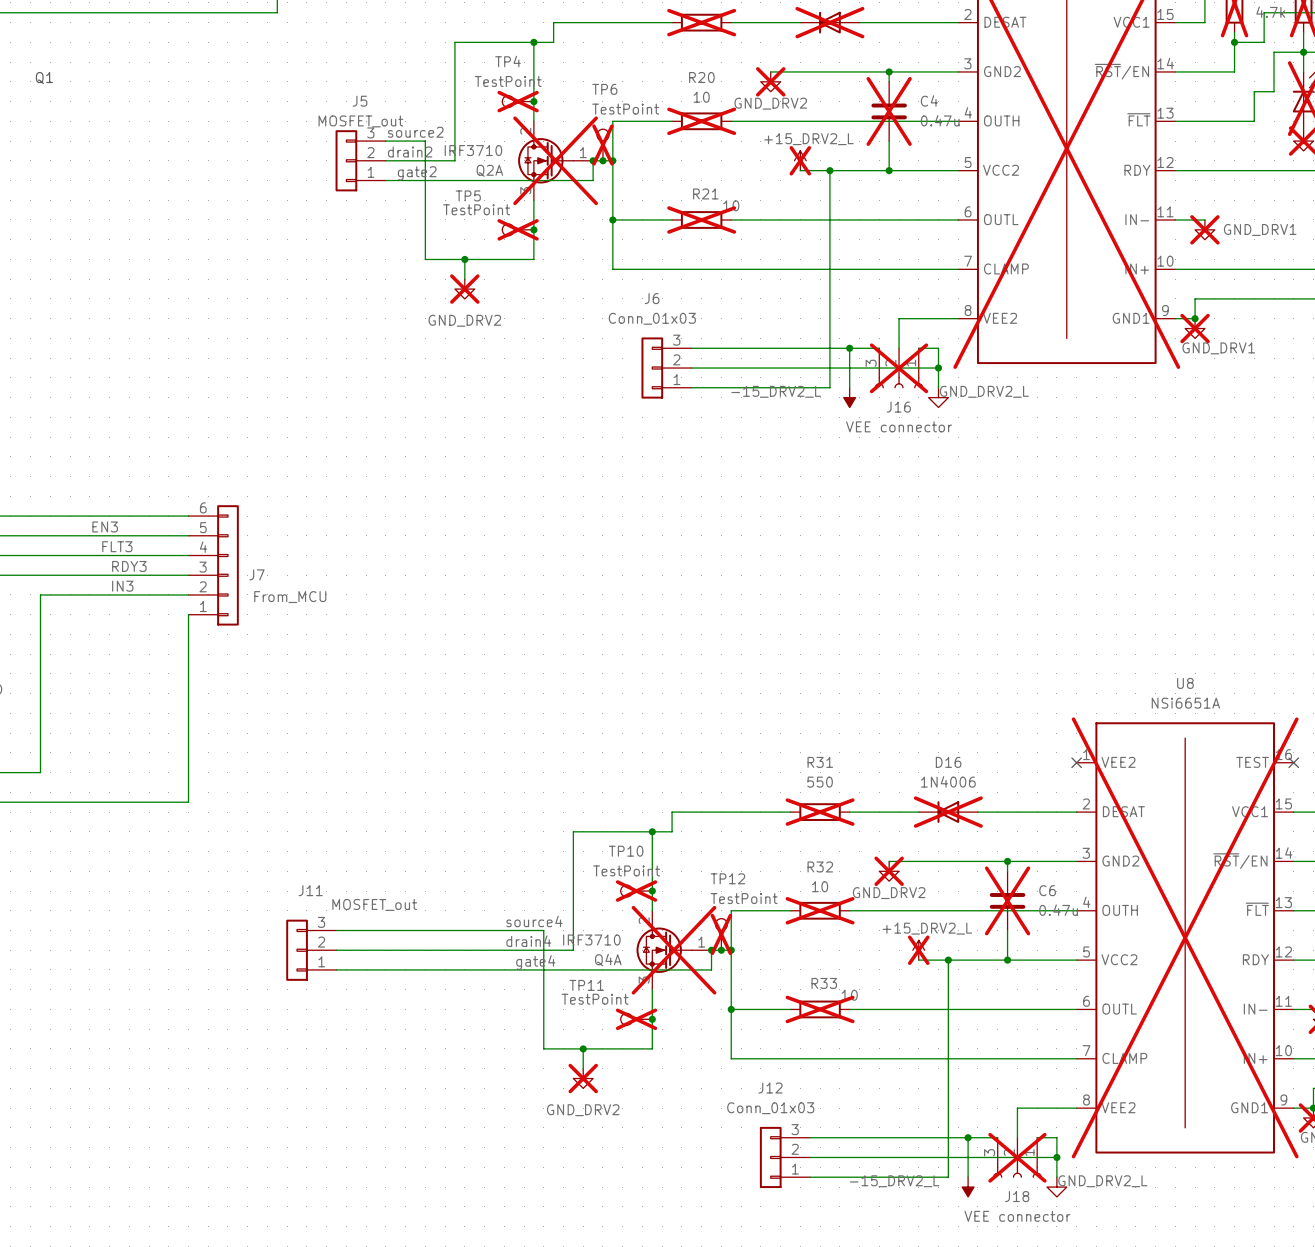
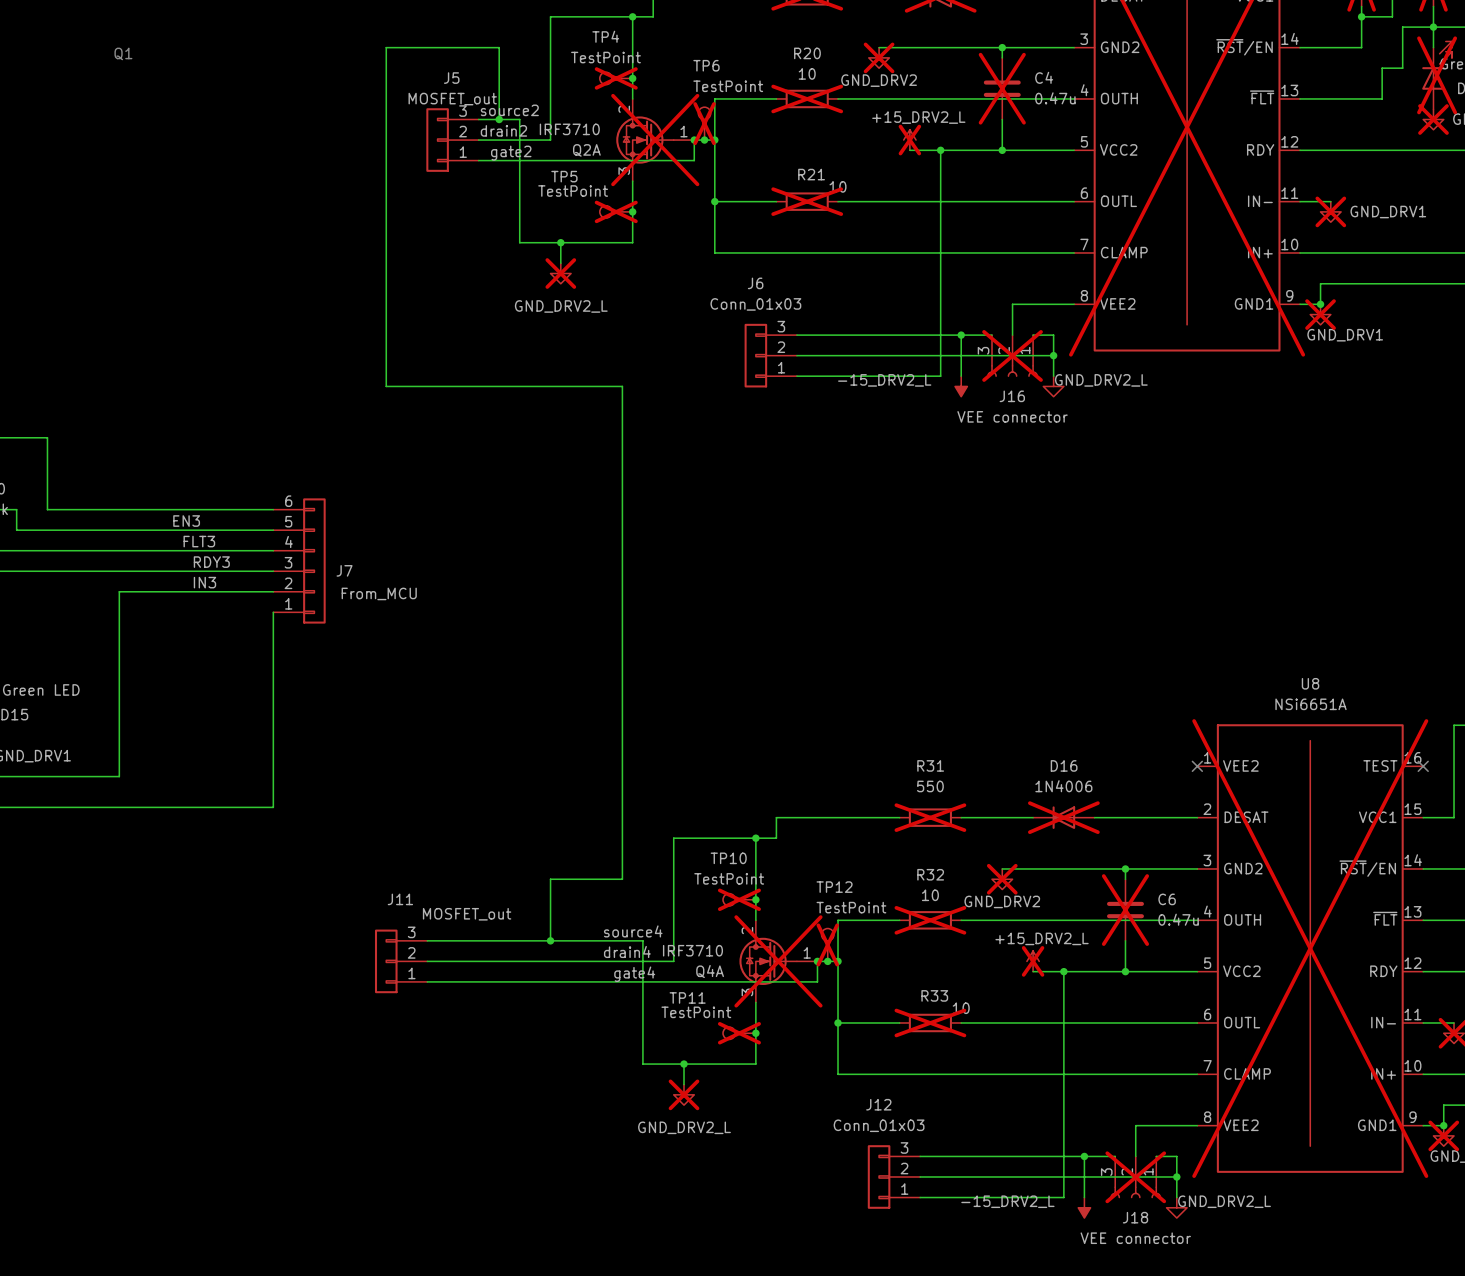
wire: none -> (499, 119) (499, 47) (386, 47) (386, 386) (622, 386) (622, 879) (550, 879) (550, 940)
junction: none -> (499, 119)
power symbol: GND_DRV2 (464, 289) -> GND_DRV2_L (560, 273)
junction: none -> (550, 940)
power symbol: GND_DRV2 (583, 1078) -> GND_DRV2_L (684, 1094)

